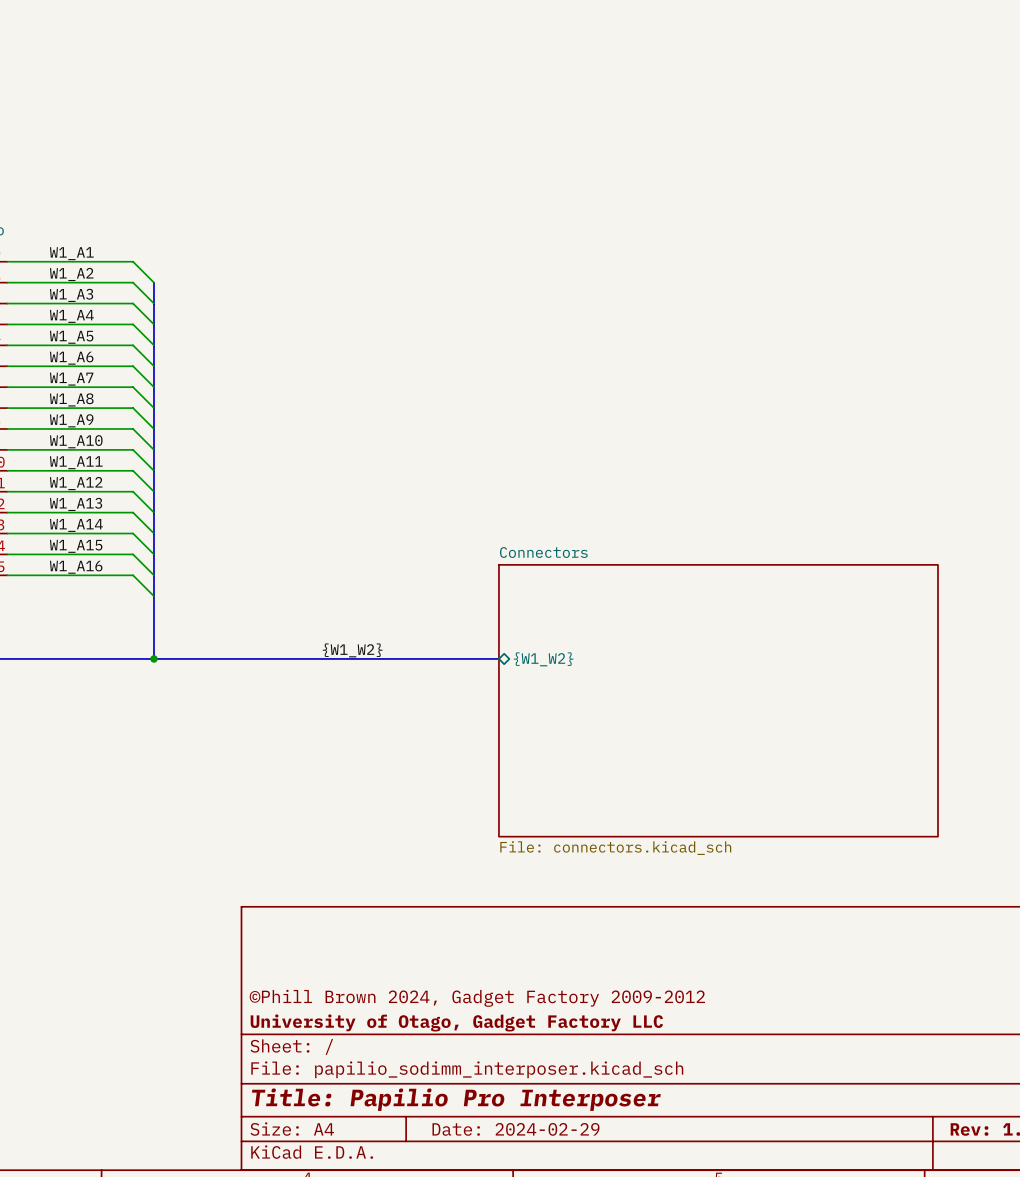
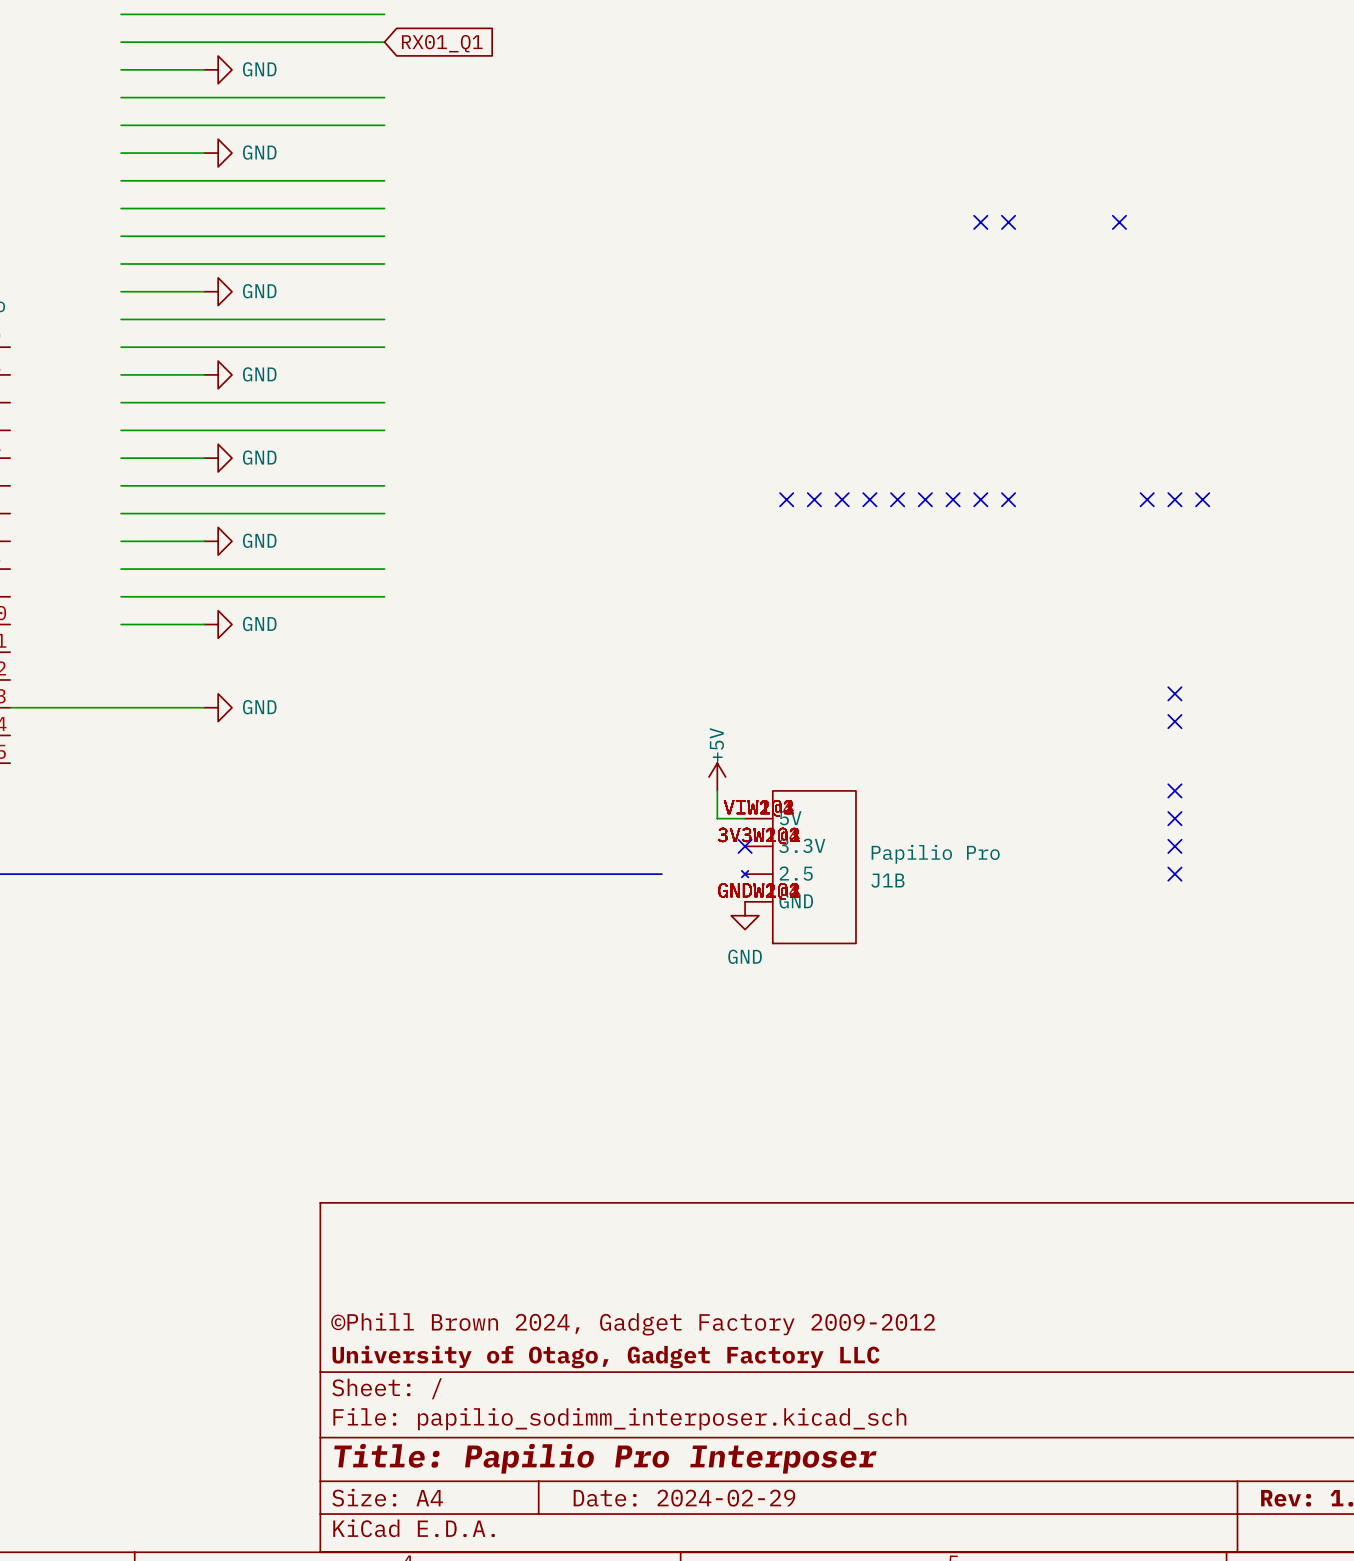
wire: none -> (121, 14) (384, 14)
wire: none -> (121, 42) (384, 42)
global label: none -> RX01_Q1 (442, 43)
wire: none -> (121, 69) (204, 69)
power symbol: none -> GND (218, 69)
wire: none -> (121, 97) (384, 97)
wire: none -> (121, 125) (384, 125)
wire: none -> (121, 153) (204, 153)
power symbol: none -> GND (218, 153)
wire: none -> (121, 180) (384, 180)
wire: none -> (121, 208) (384, 208)
no-connect mark: none -> (980, 222)
no-connect mark: none -> (1008, 222)
no-connect mark: none -> (1119, 222)
wire: none -> (121, 236) (384, 236)
wire: none -> (121, 263) (384, 263)
wire: none -> (121, 291) (204, 291)
power symbol: none -> GND (218, 291)
wire: none -> (121, 319) (384, 319)
label: W1_A1 (71, 253) -> none
wire: (7, 261) (91, 261) -> none
wire: (133, 261) (153, 282) -> (176, 374) (204, 374)
wire: none -> (176, 347) (384, 347)
label: W1_A2 (71, 274) -> none
wire: (7, 282) (91, 282) -> none
wire: (133, 282) (153, 303) -> none
bus: (153, 282) (153, 658) -> none
power symbol: none -> GND (218, 374)
label: W1_A3 (71, 295) -> none
wire: (7, 303) (91, 303) -> none
wire: (133, 303) (153, 324) -> (176, 402) (384, 402)
label: W1_A4 (71, 316) -> none
wire: (7, 324) (91, 324) -> none
wire: (133, 324) (153, 345) -> (176, 458) (204, 458)
wire: none -> (176, 430) (384, 430)
label: W1_A5 (71, 337) -> none
wire: (7, 345) (91, 345) -> none
wire: (133, 345) (153, 366) -> none
power symbol: none -> GND (218, 458)
label: W1_A6 (71, 358) -> none
wire: (7, 366) (91, 366) -> none
wire: (133, 366) (153, 387) -> (176, 485) (384, 485)
no-connect mark: none -> (786, 499)
no-connect mark: none -> (814, 499)
no-connect mark: none -> (842, 499)
no-connect mark: none -> (869, 499)
no-connect mark: none -> (897, 499)
no-connect mark: none -> (925, 499)
no-connect mark: none -> (953, 499)
no-connect mark: none -> (980, 499)
no-connect mark: none -> (1008, 499)
no-connect mark: none -> (1147, 499)
no-connect mark: none -> (1174, 499)
no-connect mark: none -> (1202, 499)
label: W1_A7 (71, 379) -> none
wire: (7, 387) (91, 387) -> none
wire: (133, 387) (153, 408) -> (176, 541) (204, 541)
wire: none -> (176, 513) (384, 513)
label: W1_A8 (71, 399) -> none
wire: (7, 408) (91, 408) -> none
wire: (133, 408) (153, 428) -> none
power symbol: none -> GND (218, 541)
label: W1_A9 (71, 420) -> none
wire: (7, 428) (91, 428) -> none
wire: (133, 428) (153, 449) -> (176, 569) (384, 569)
label: W1_A10 (76, 441) -> none
wire: (7, 449) (91, 449) -> none
wire: (133, 449) (153, 470) -> (176, 624) (204, 624)
wire: none -> (176, 596) (384, 596)
label: W1_A11 (76, 462) -> none
wire: (7, 470) (91, 470) -> none
wire: (133, 470) (153, 491) -> none
power symbol: none -> GND (218, 624)
label: W1_A12 (76, 483) -> none
wire: (7, 491) (133, 491) (153, 512) -> none
label: W1_A13 (76, 504) -> none
wire: (7, 512) (133, 512) (153, 533) -> none
no-connect mark: none -> (1174, 693)
label: W1_A14 (76, 525) -> none
wire: (133, 533) (153, 554) -> (176, 707) (204, 707)
power symbol: none -> GND (218, 707)
no-connect mark: none -> (1174, 721)
label: W1_A15 (76, 546) -> none
wire: (7, 554) (133, 554) (153, 575) -> none
label: W1_A16 (76, 567) -> none
wire: (7, 575) (133, 575) (153, 596) -> none
power symbol: none -> +5V (717, 777)
wire: none -> (717, 790) (717, 818) (745, 818)
no-connect mark: none -> (1174, 790)
no-connect mark: none -> (1174, 818)
no-connect mark: none -> (745, 846)
no-connect mark: none -> (1174, 846)
label: {W1_W2} (352, 650) -> none
J1B: none -> Papilio Pro (798, 867)
junction: (153, 658) -> none
no-connect mark: none -> (1174, 874)
sheet pin: {W1_W2} (543, 659) -> none
power symbol: none -> GND (745, 915)
sheet Connectors: File: connectors.kicad_sch (718, 700) -> none

